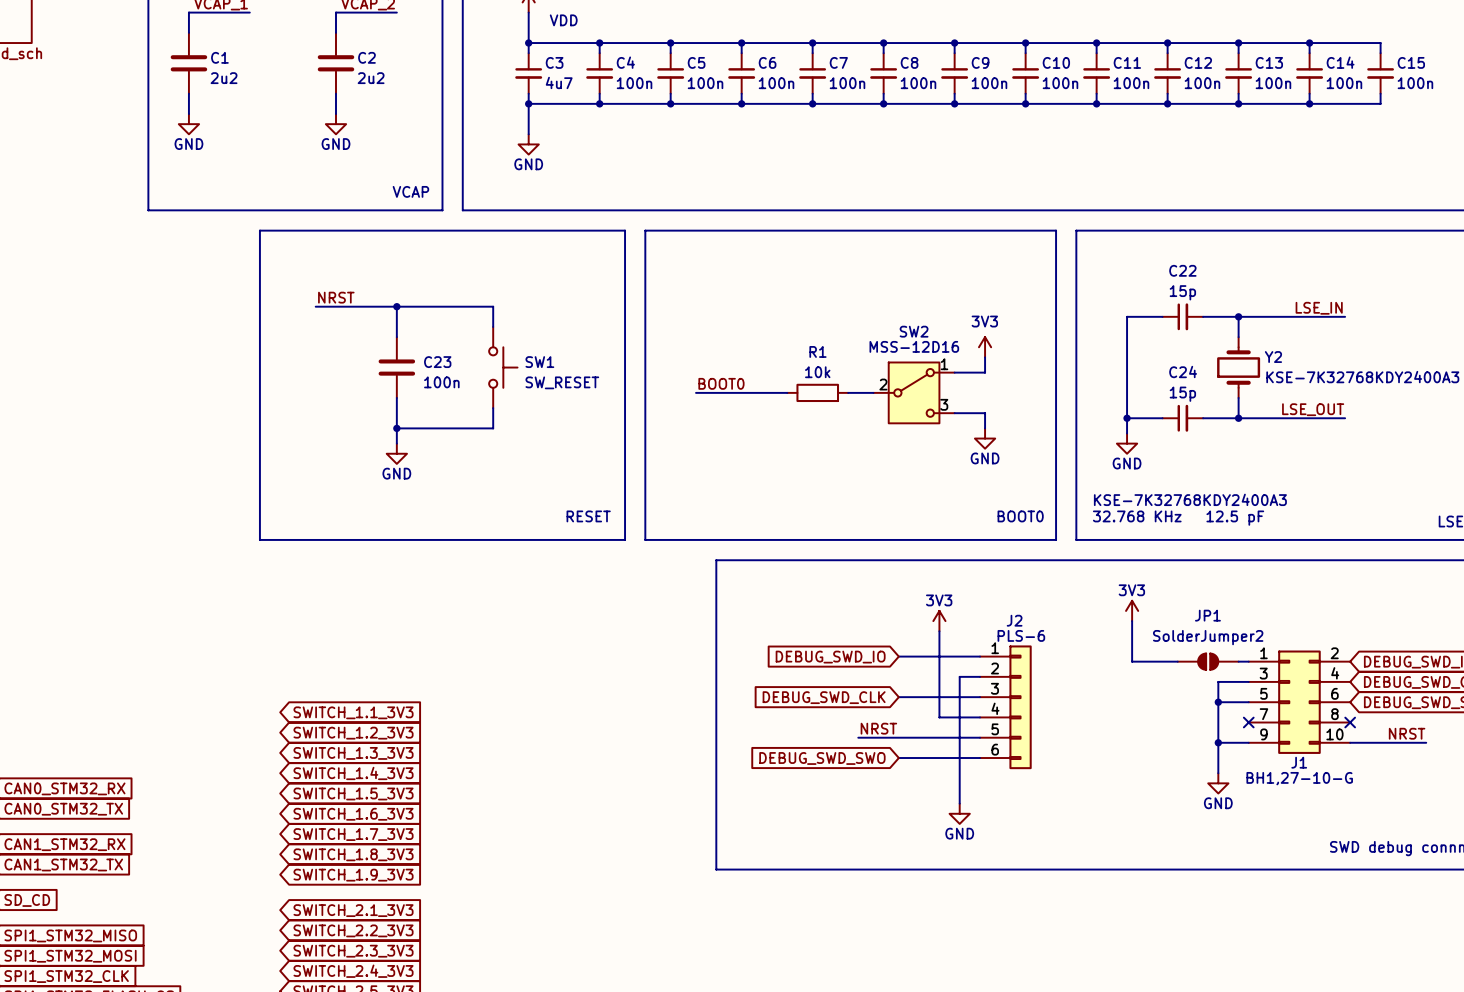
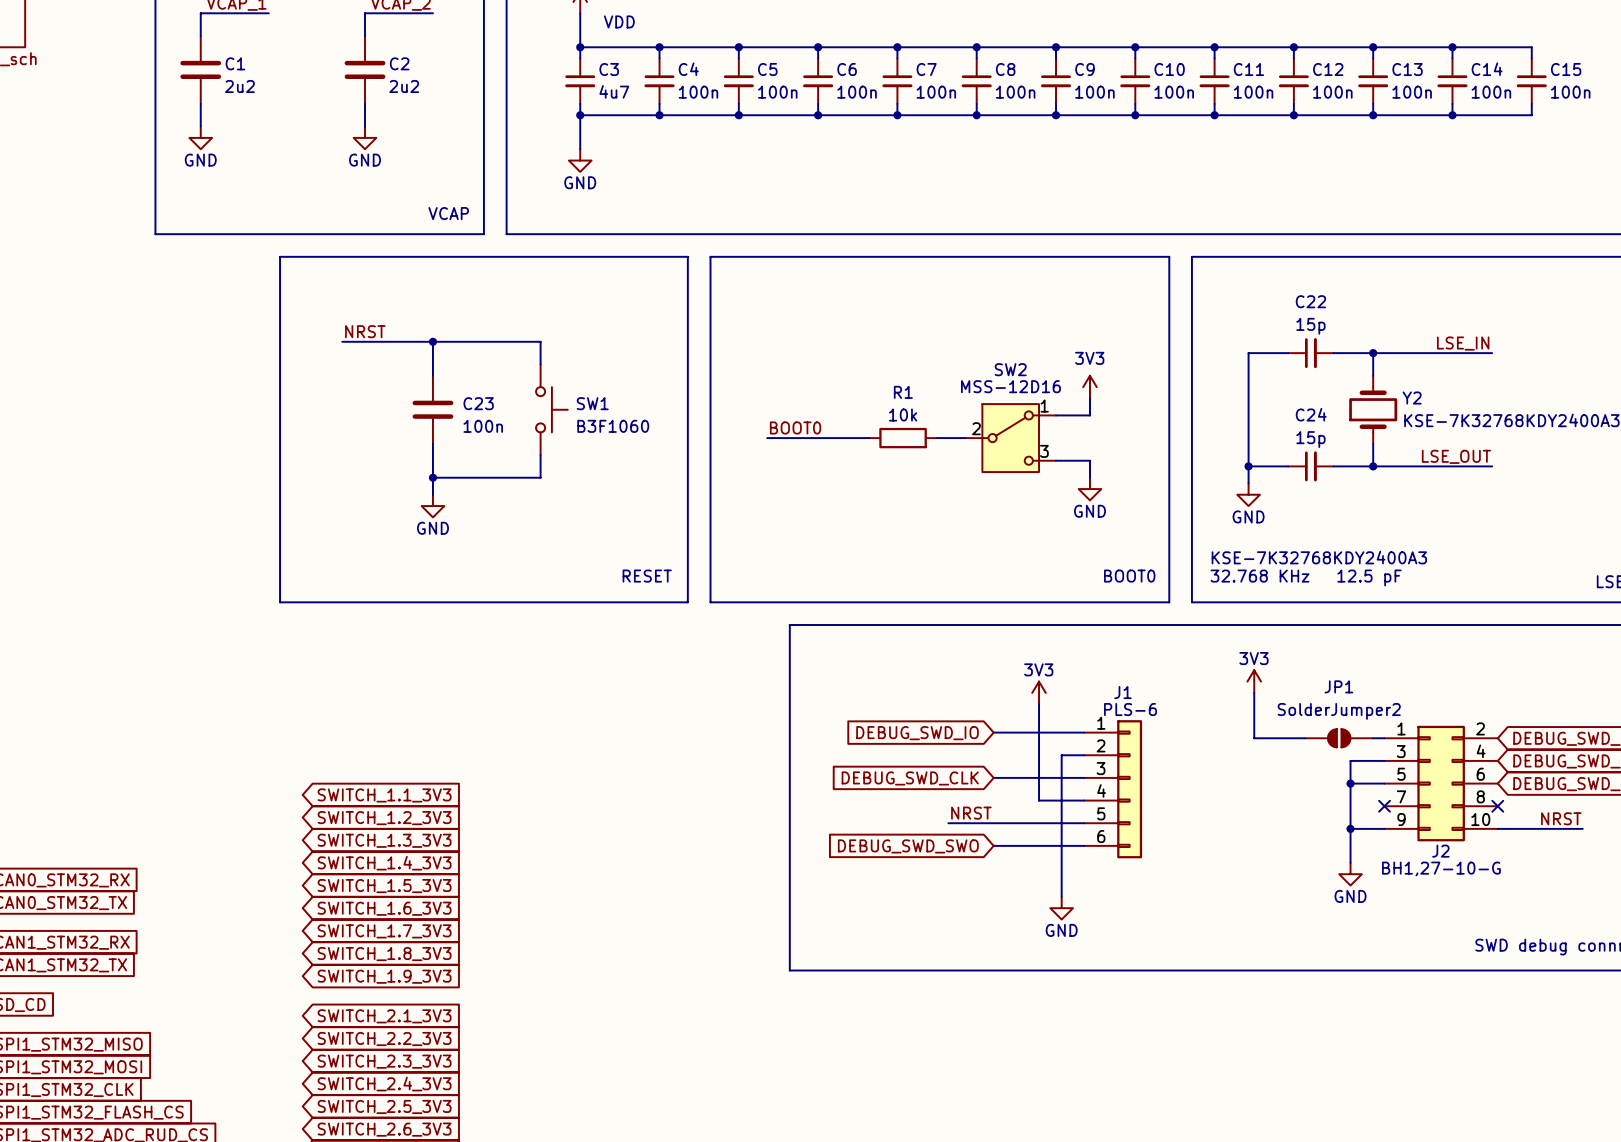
SW1 value: SW_RESET (562, 382) -> B3F1060 (613, 426)
J2 name: J2 (1014, 620) -> J1 (1122, 692)
J1 name: J1 (1299, 762) -> J2 (1440, 851)

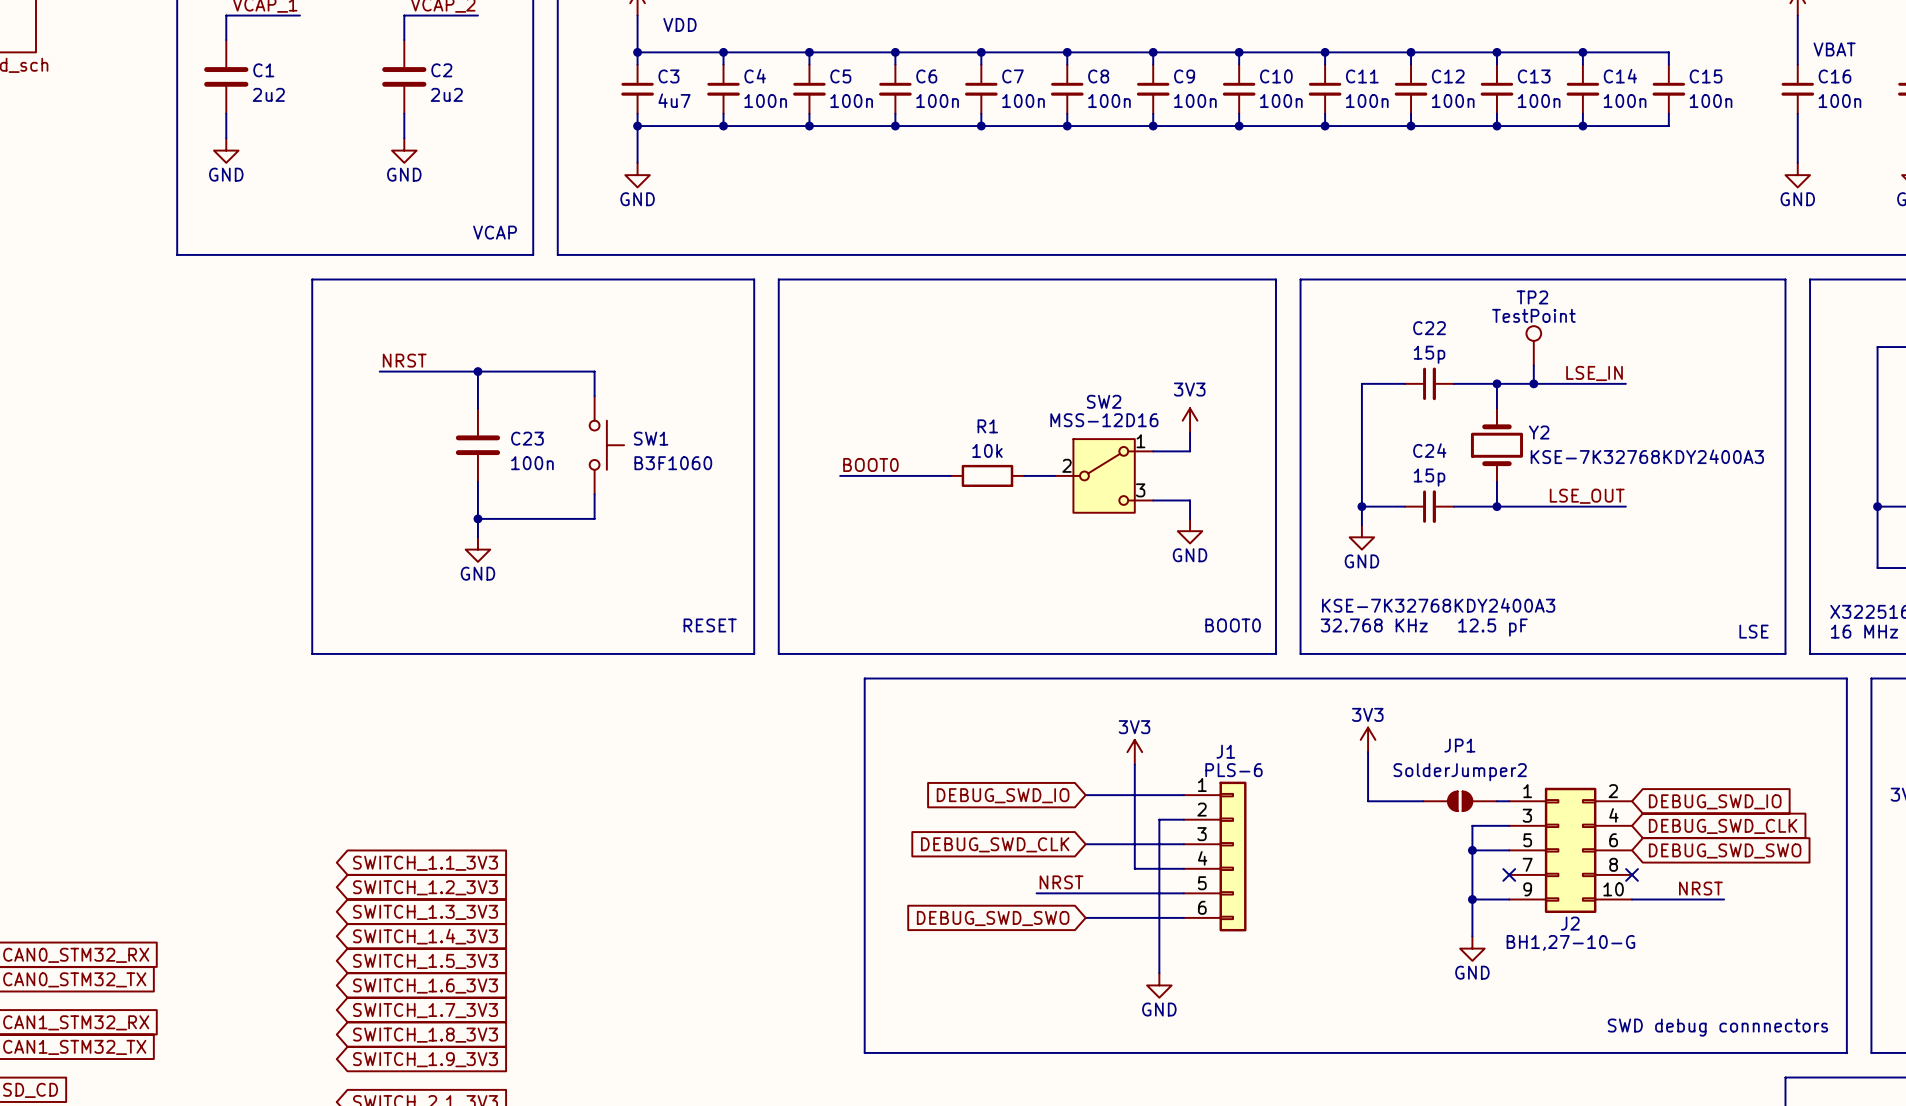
TP2: none -> TestPoint (1533, 345)
wire: none -> (1533, 365) (1533, 383)
junction: none -> (1533, 383)

